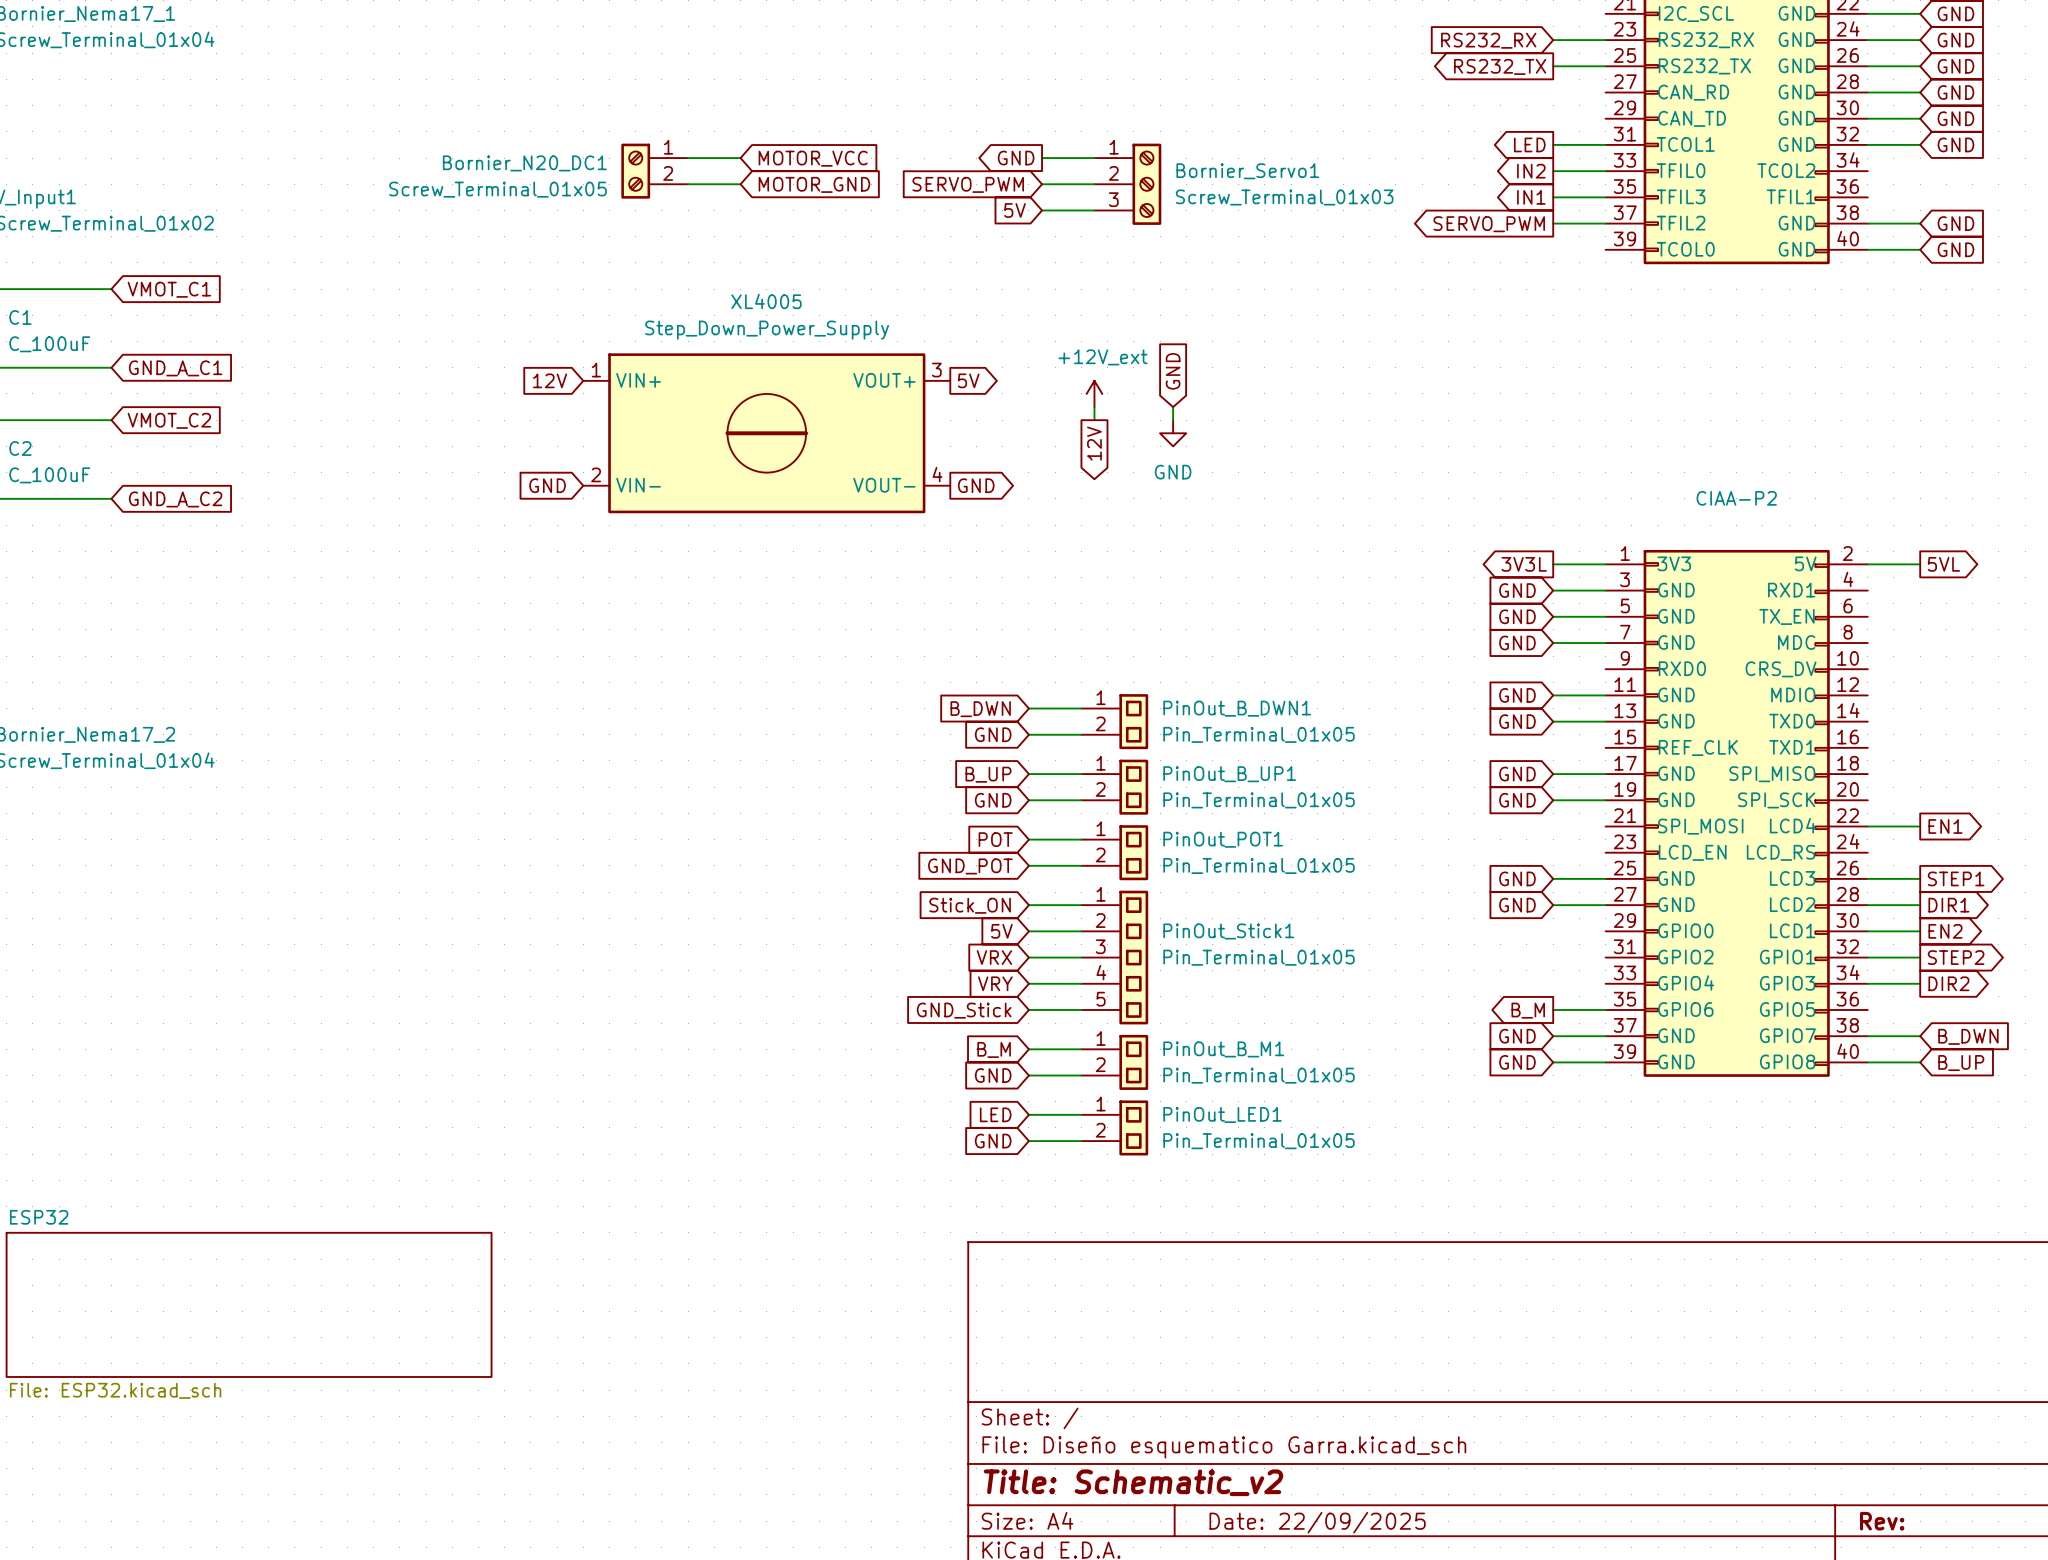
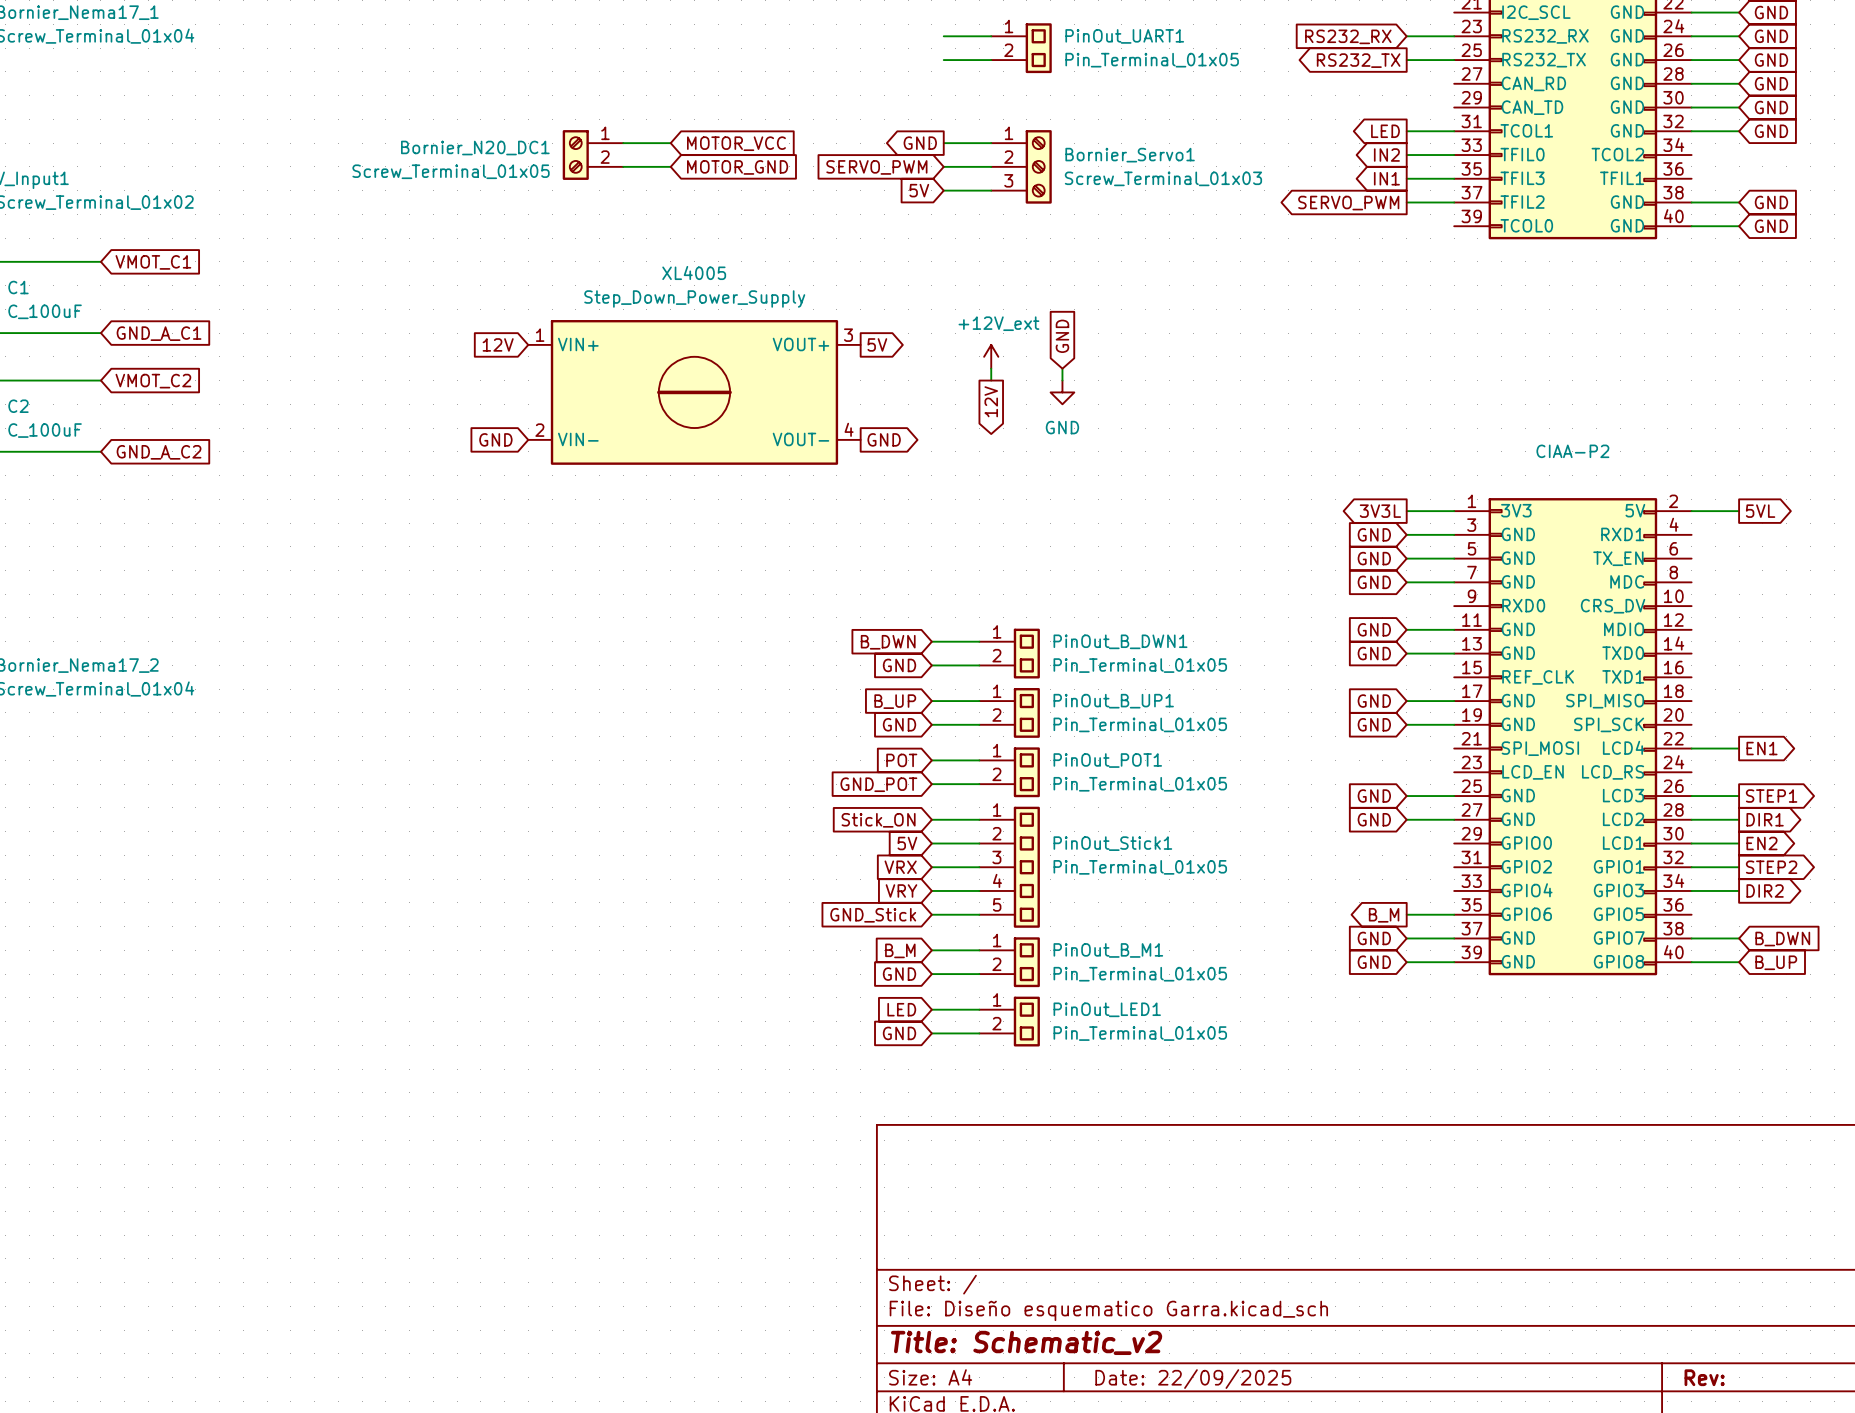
wire: none -> (943, 36) (991, 36)
PinOut_UART1: none -> Pin_Terminal_01x05 (1021, 48)
wire: none -> (943, 60) (991, 60)
sheet ESP32: File: ESP32.kicad_sch (249, 1304) -> none

